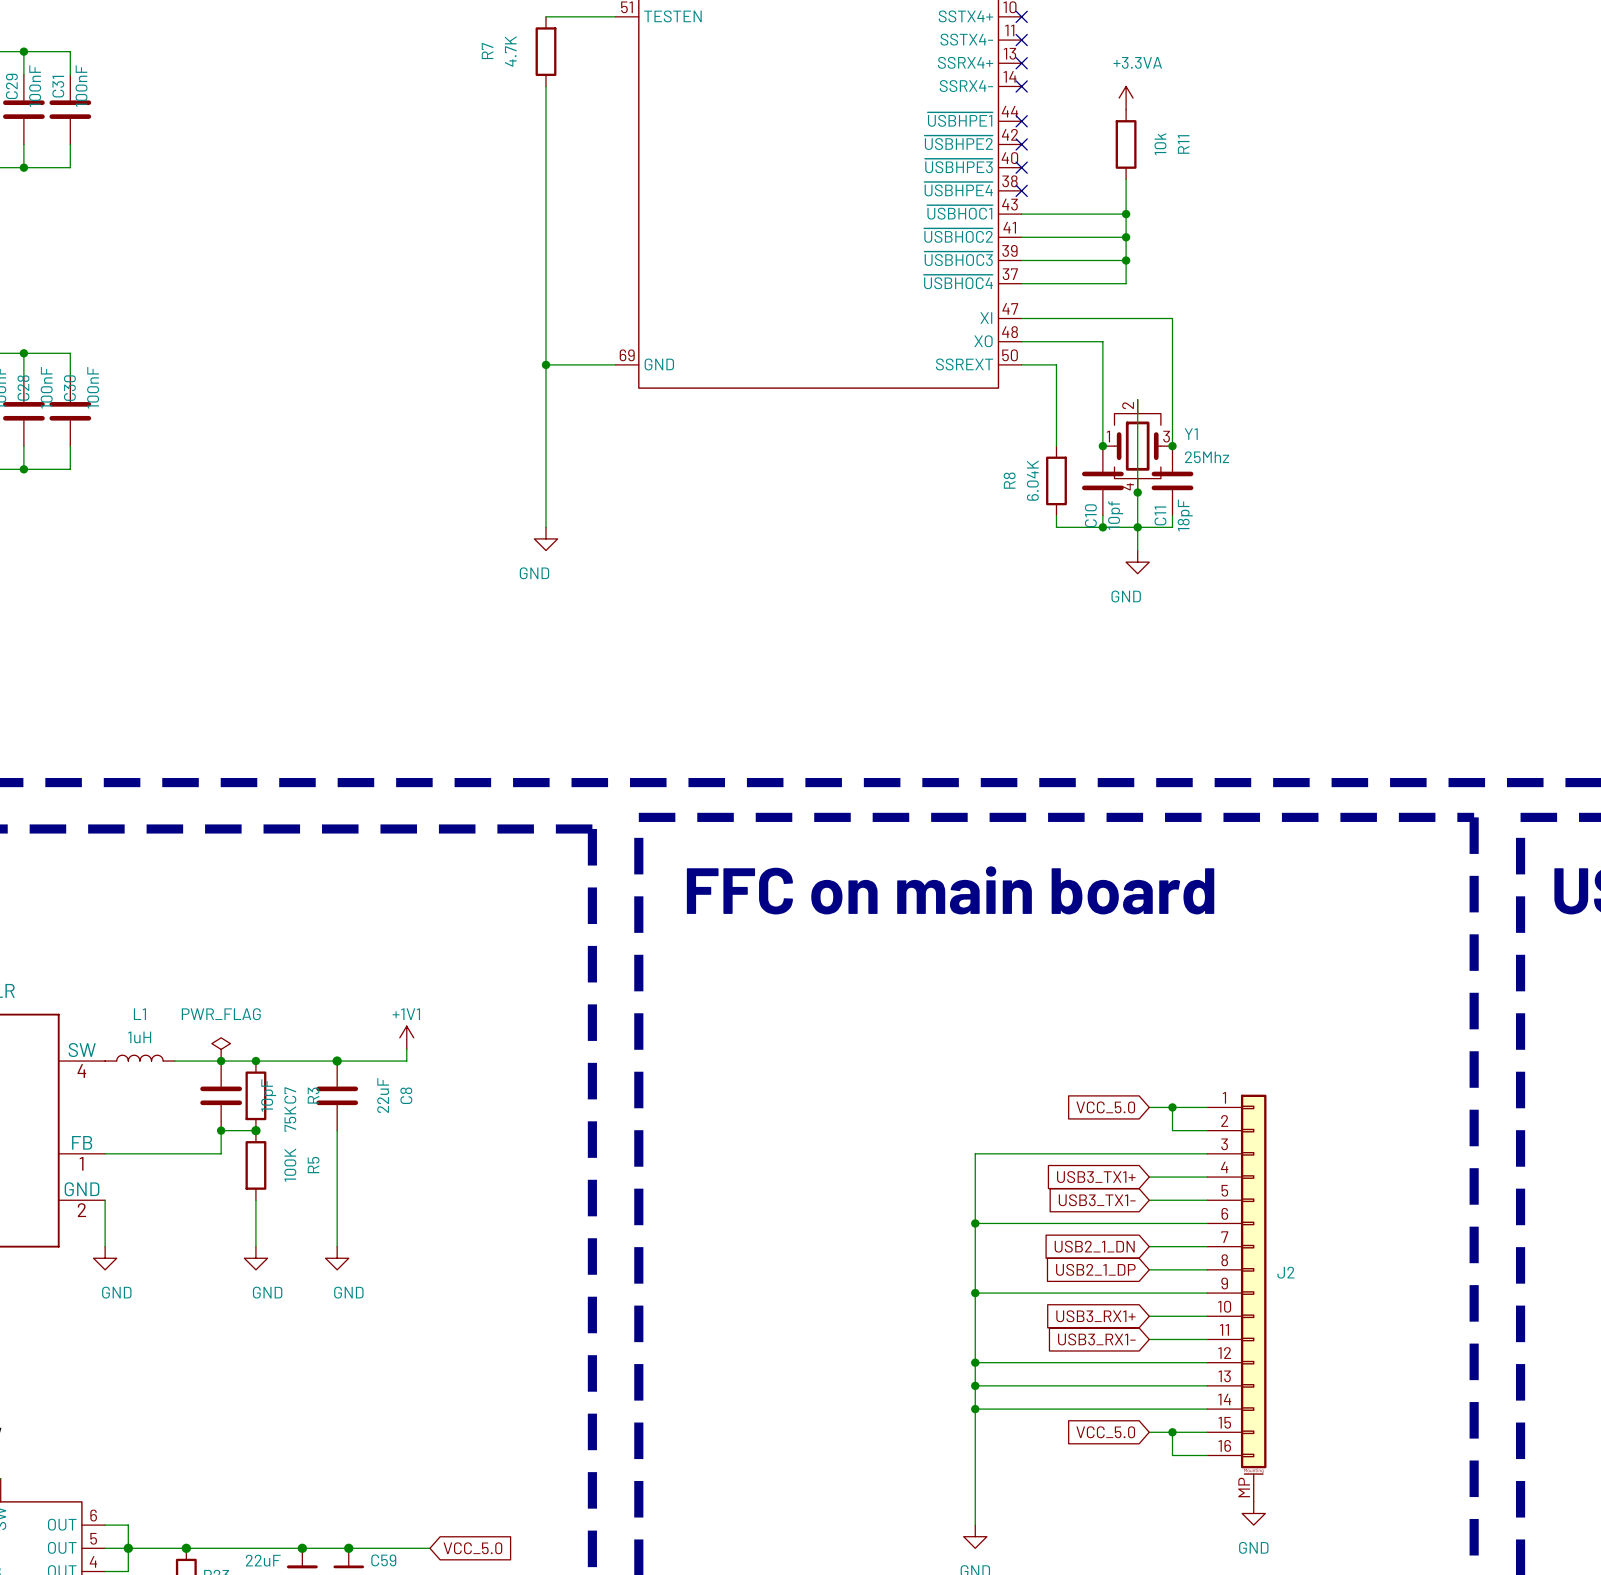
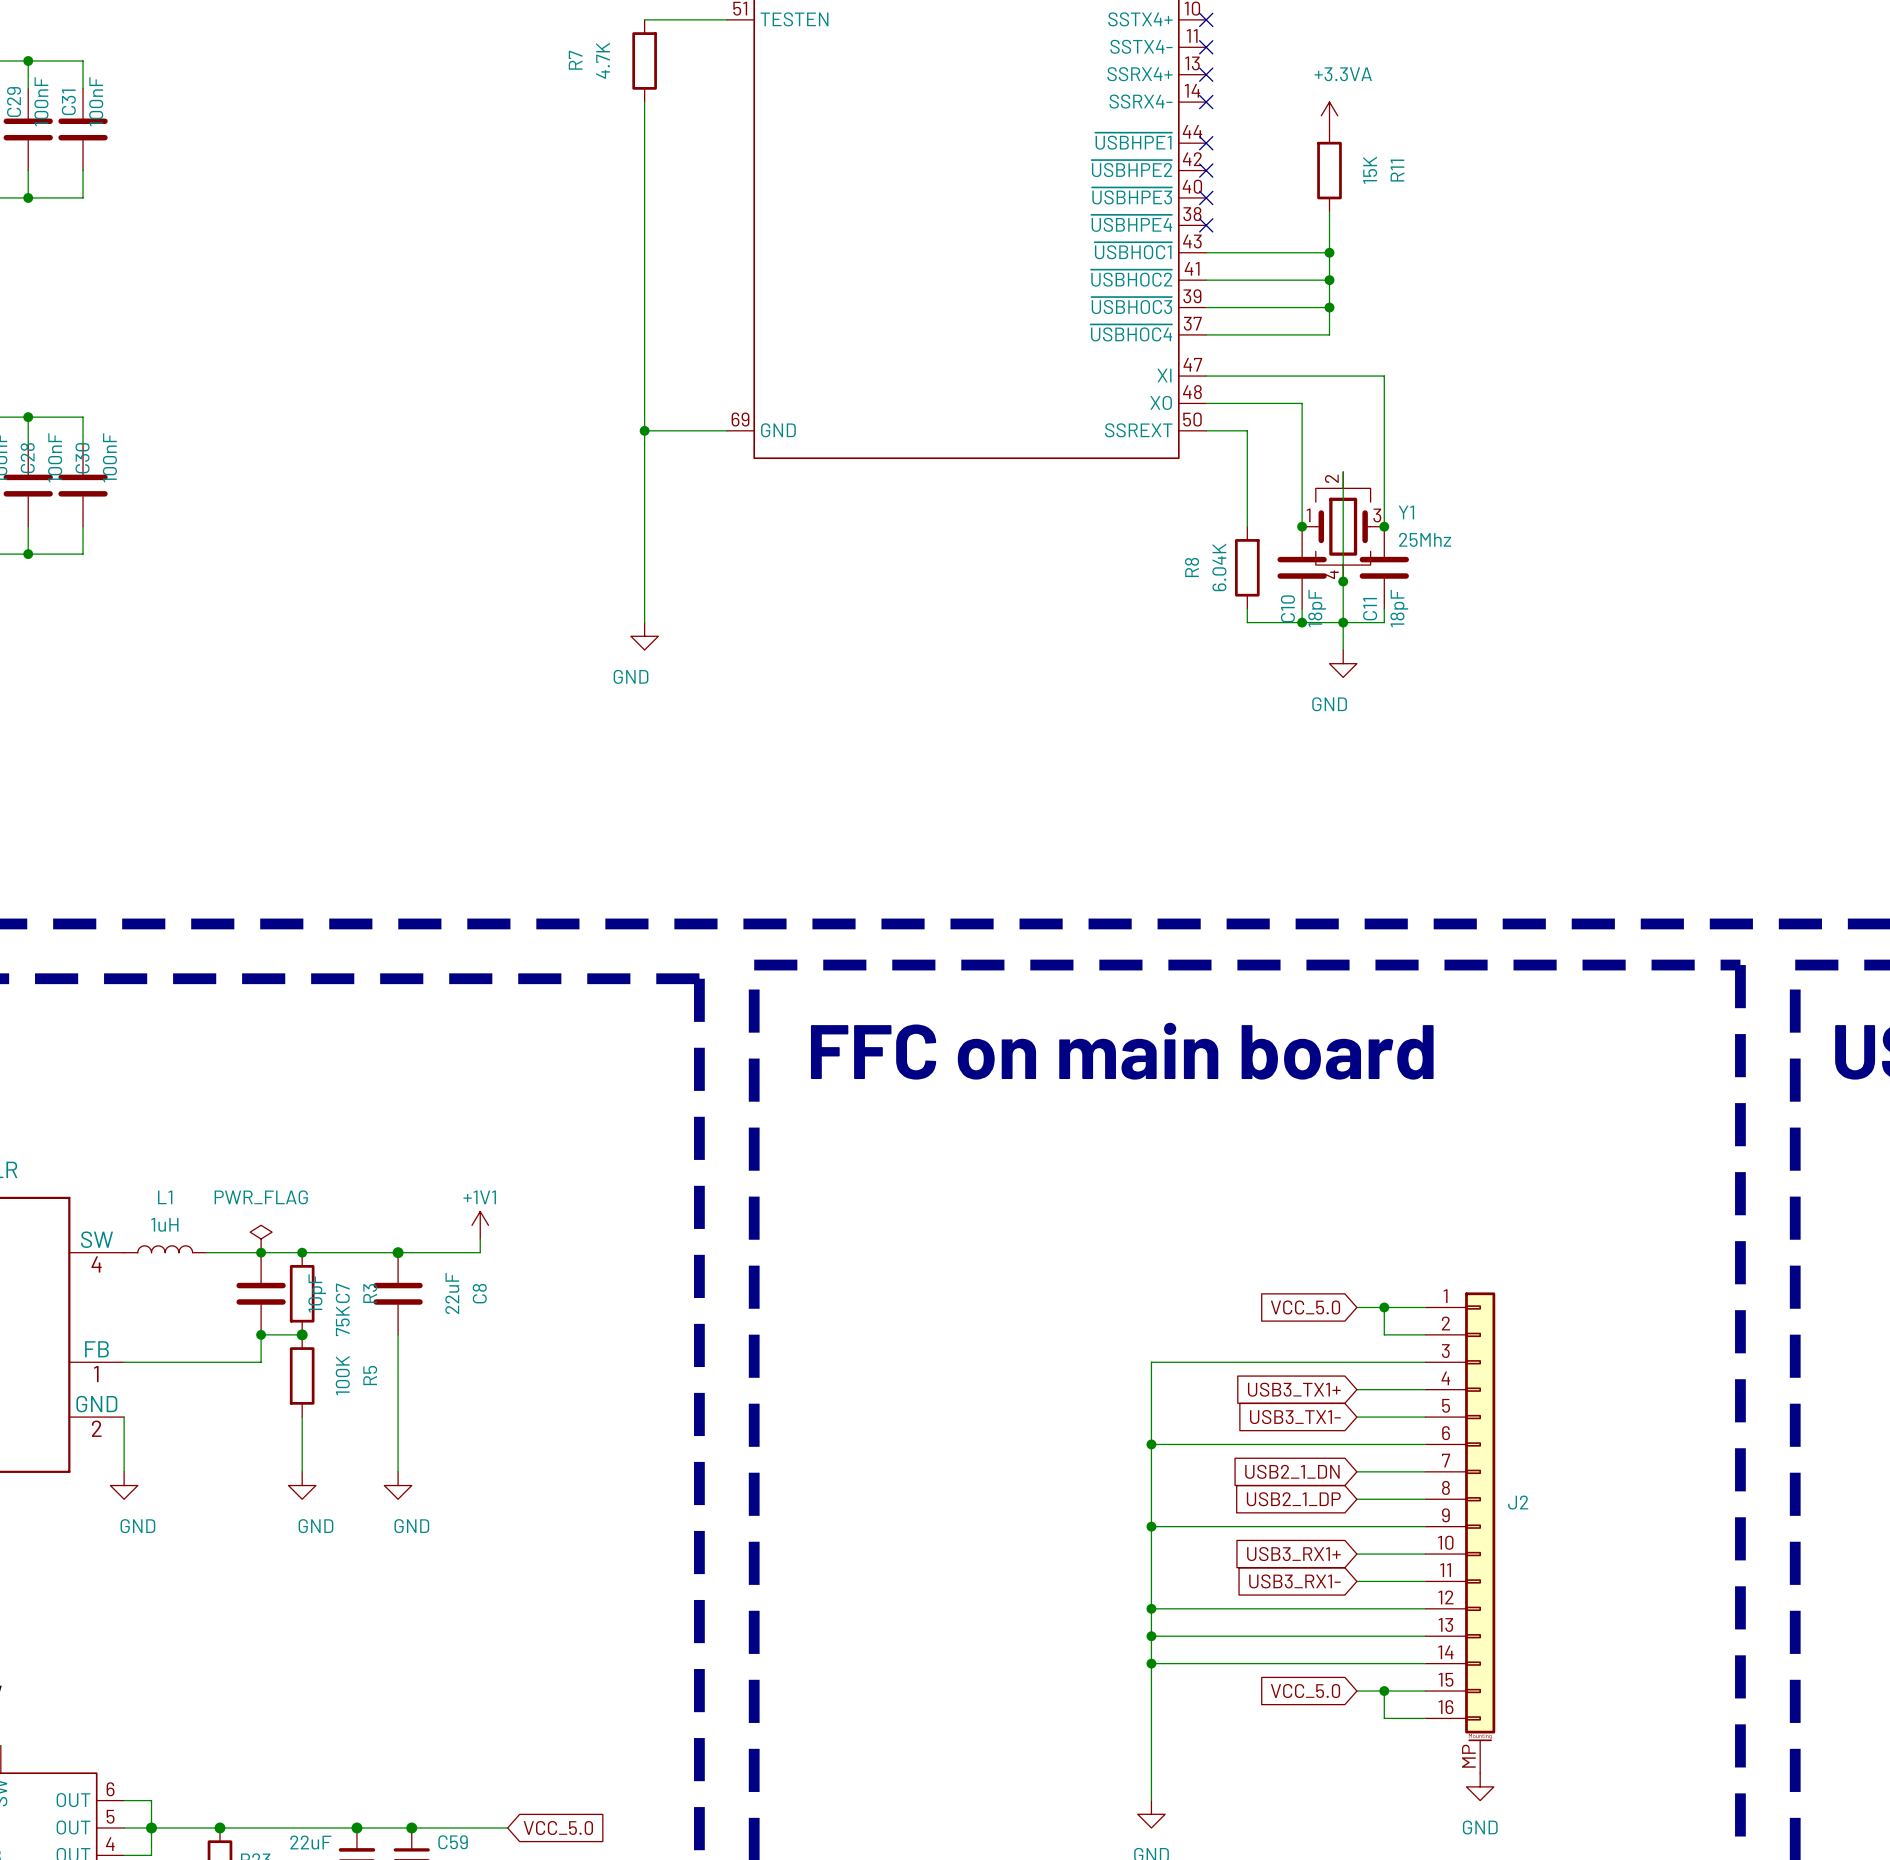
R11 value: 10k (1160, 144) -> 15K (1370, 170)
C10 value: 10pf (1115, 515) -> 18pF (1317, 608)

